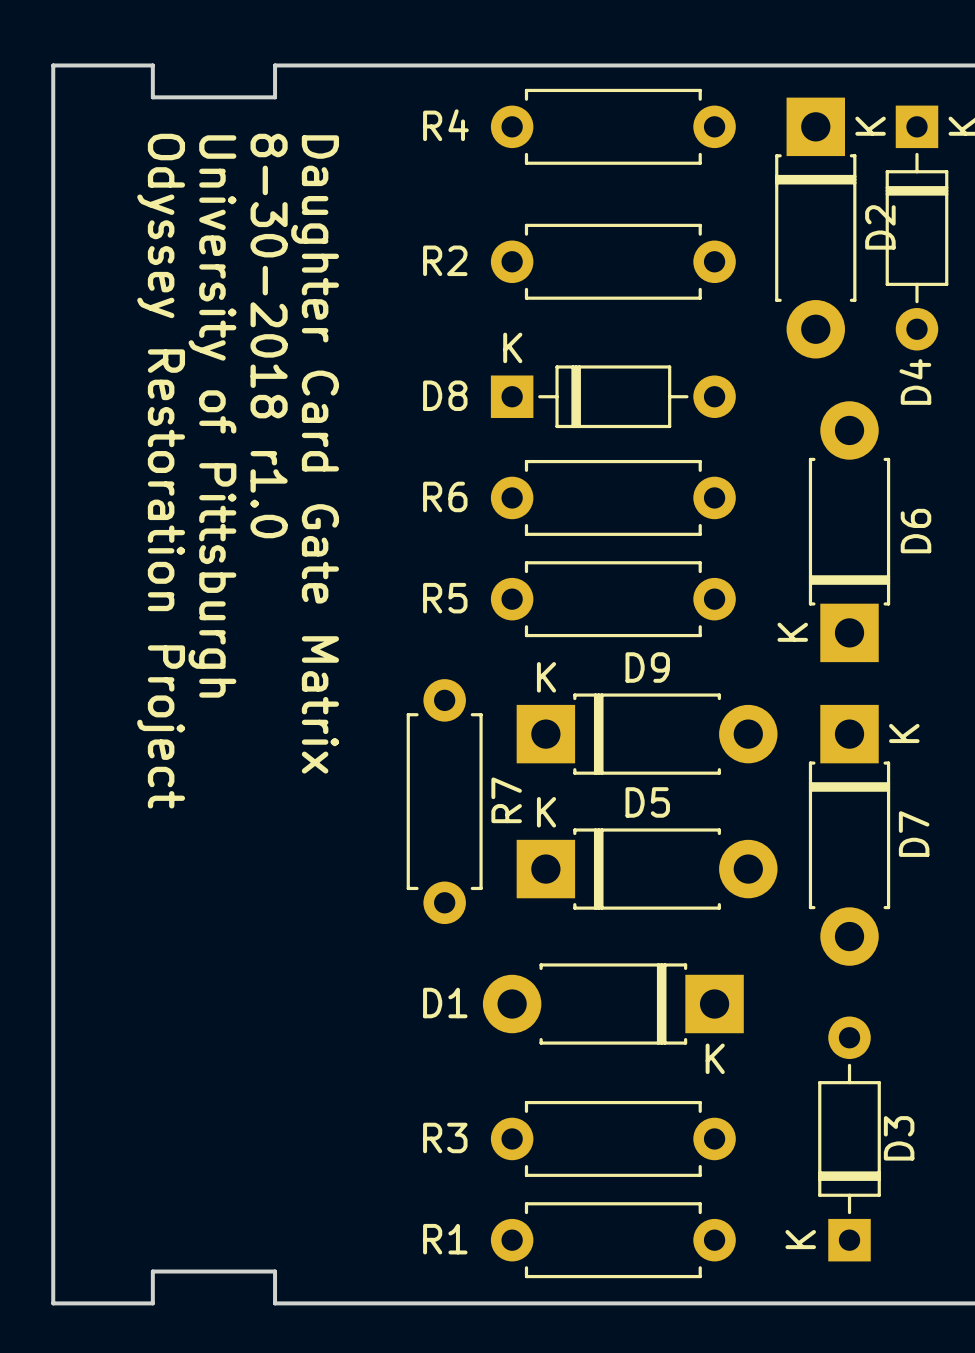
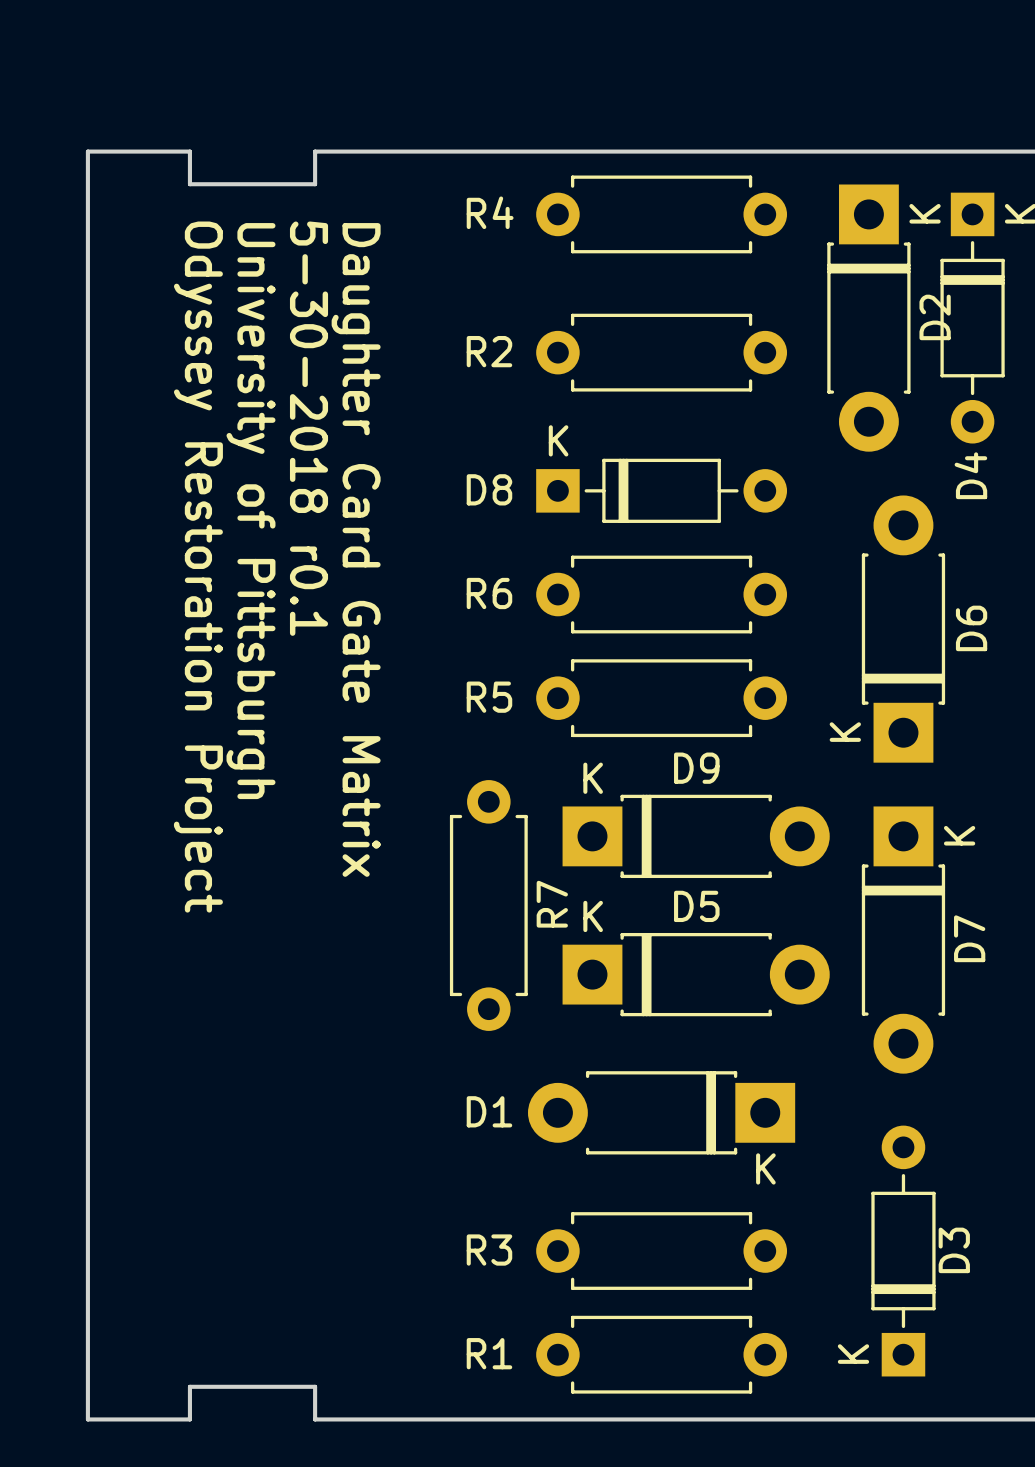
text: 8-30-2018 r1.0 (269, 336) -> 5-30-2018 r0.1 (309, 428)

